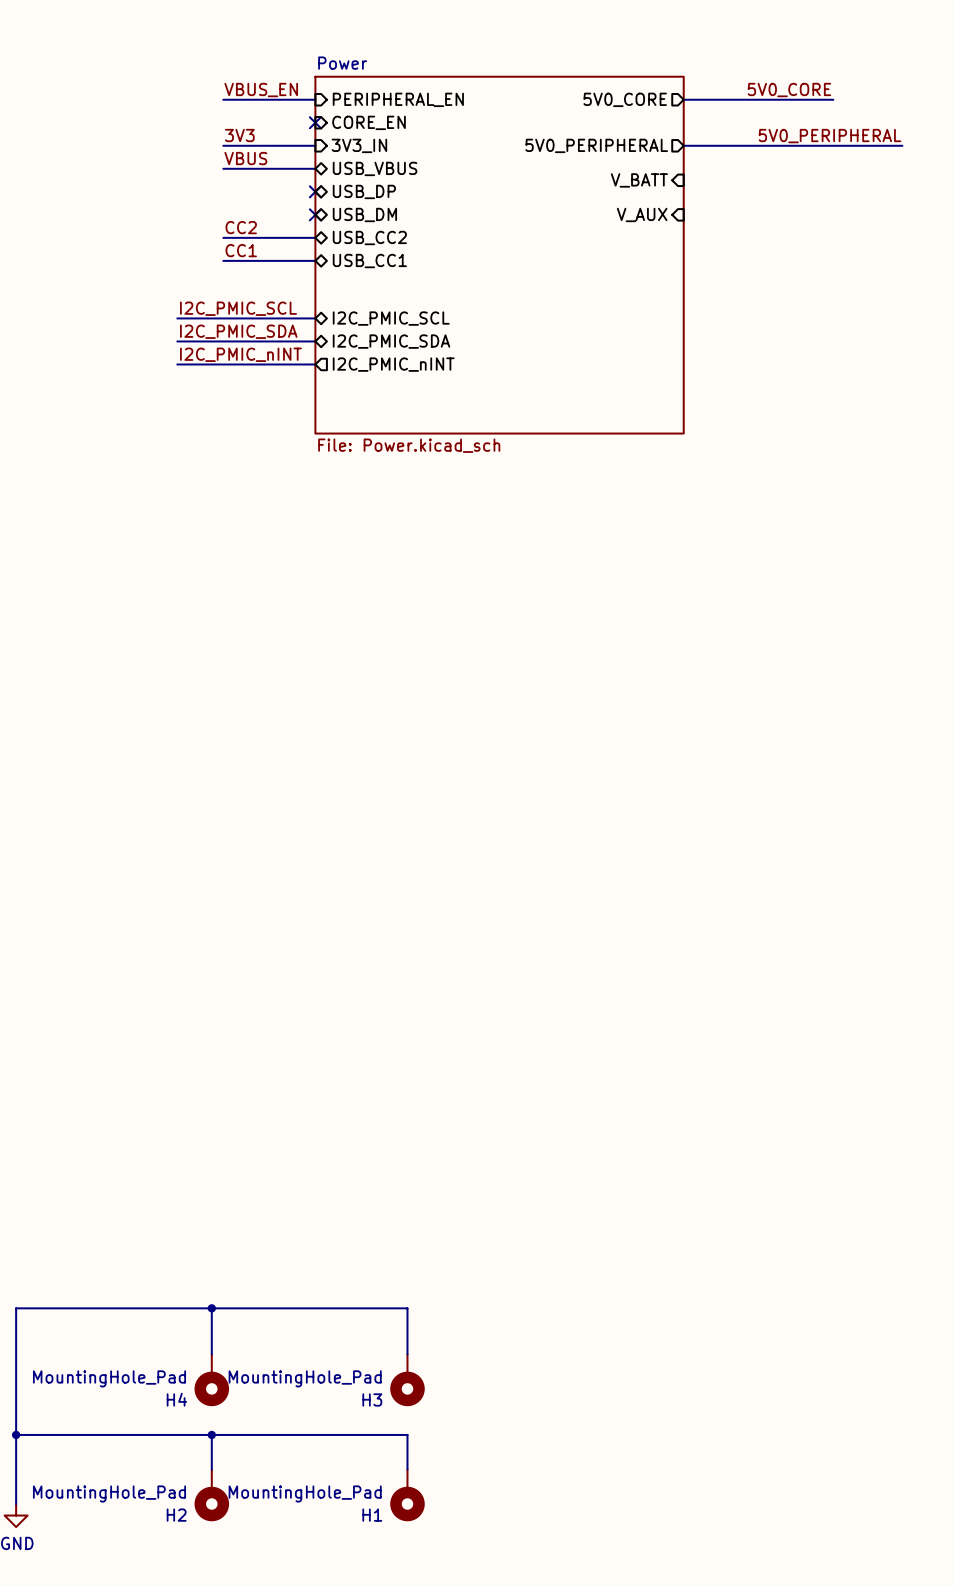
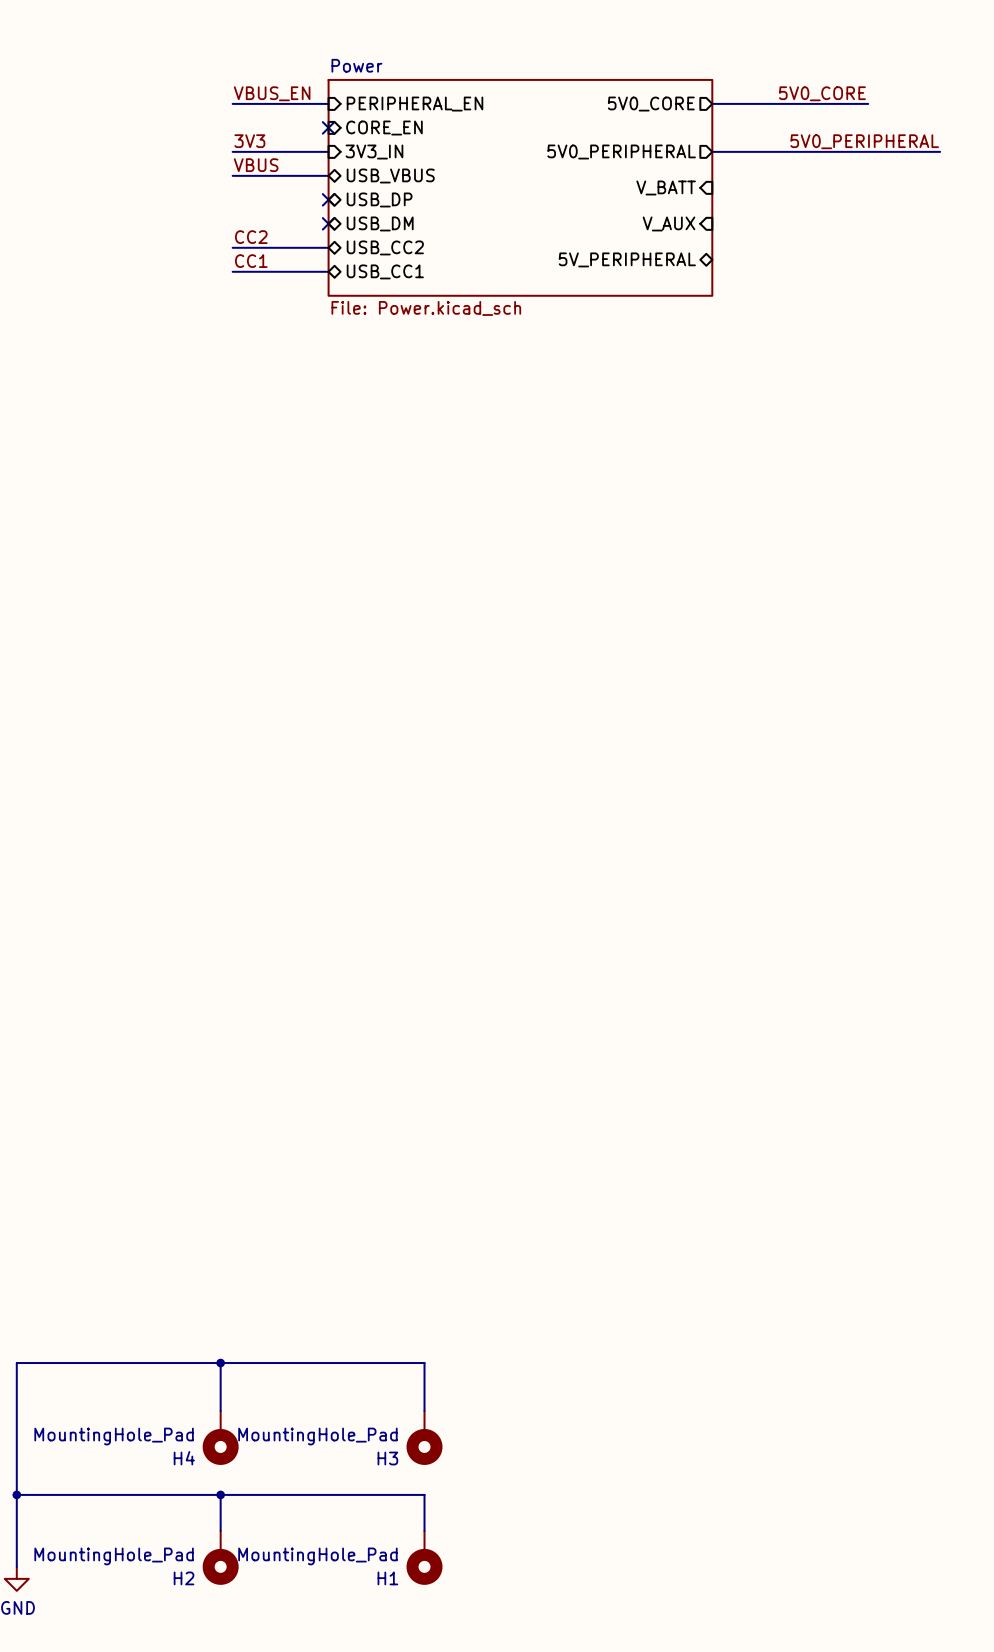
sheet Power: none -> File: Power.kicad_sch (520, 187)
sheet pin: none -> 5V_PERIPHERAL (627, 259)
sheet Power: File: Power.kicad_sch (499, 255) -> none
label: I2C_PMIC_SCL (238, 308) -> none
wire: (177, 318) (315, 318) -> none
sheet pin: I2C_PMIC_SCL (391, 318) -> none
label: I2C_PMIC_SDA (238, 331) -> none
wire: (177, 341) (315, 341) -> none
sheet pin: I2C_PMIC_SDA (391, 341) -> none
label: I2C_PMIC_nINT (240, 354) -> none
wire: (177, 364) (315, 364) -> none
sheet pin: I2C_PMIC_nINT (393, 364) -> none

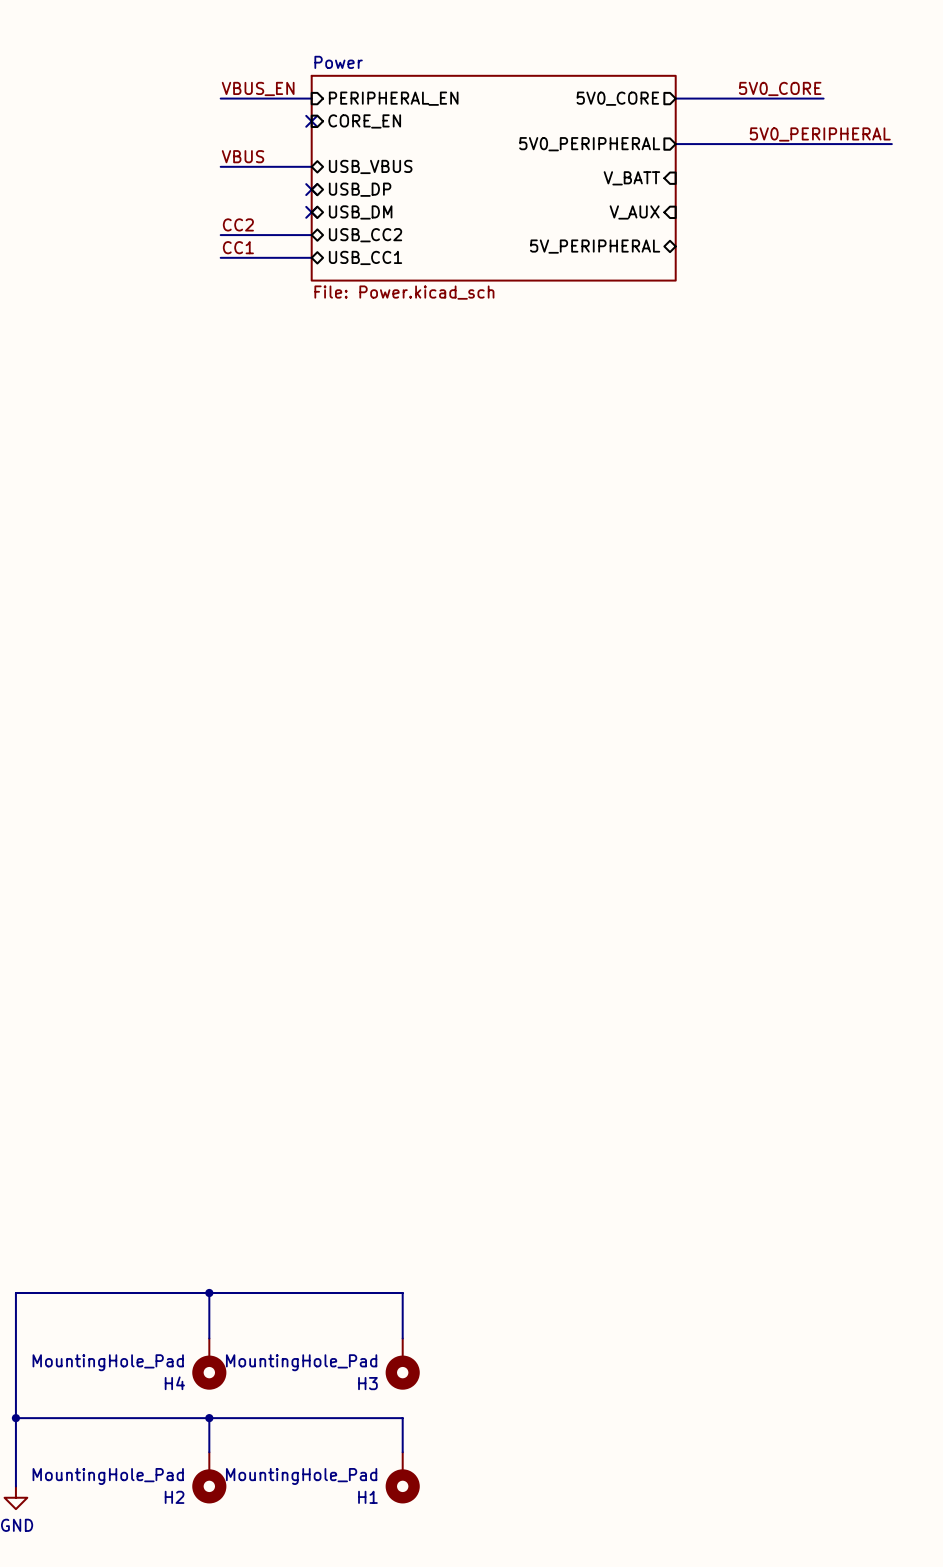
label: 3V3 (249, 141) -> none
wire: (232, 151) (328, 151) -> none
sheet pin: 3V3_IN (374, 152) -> none

